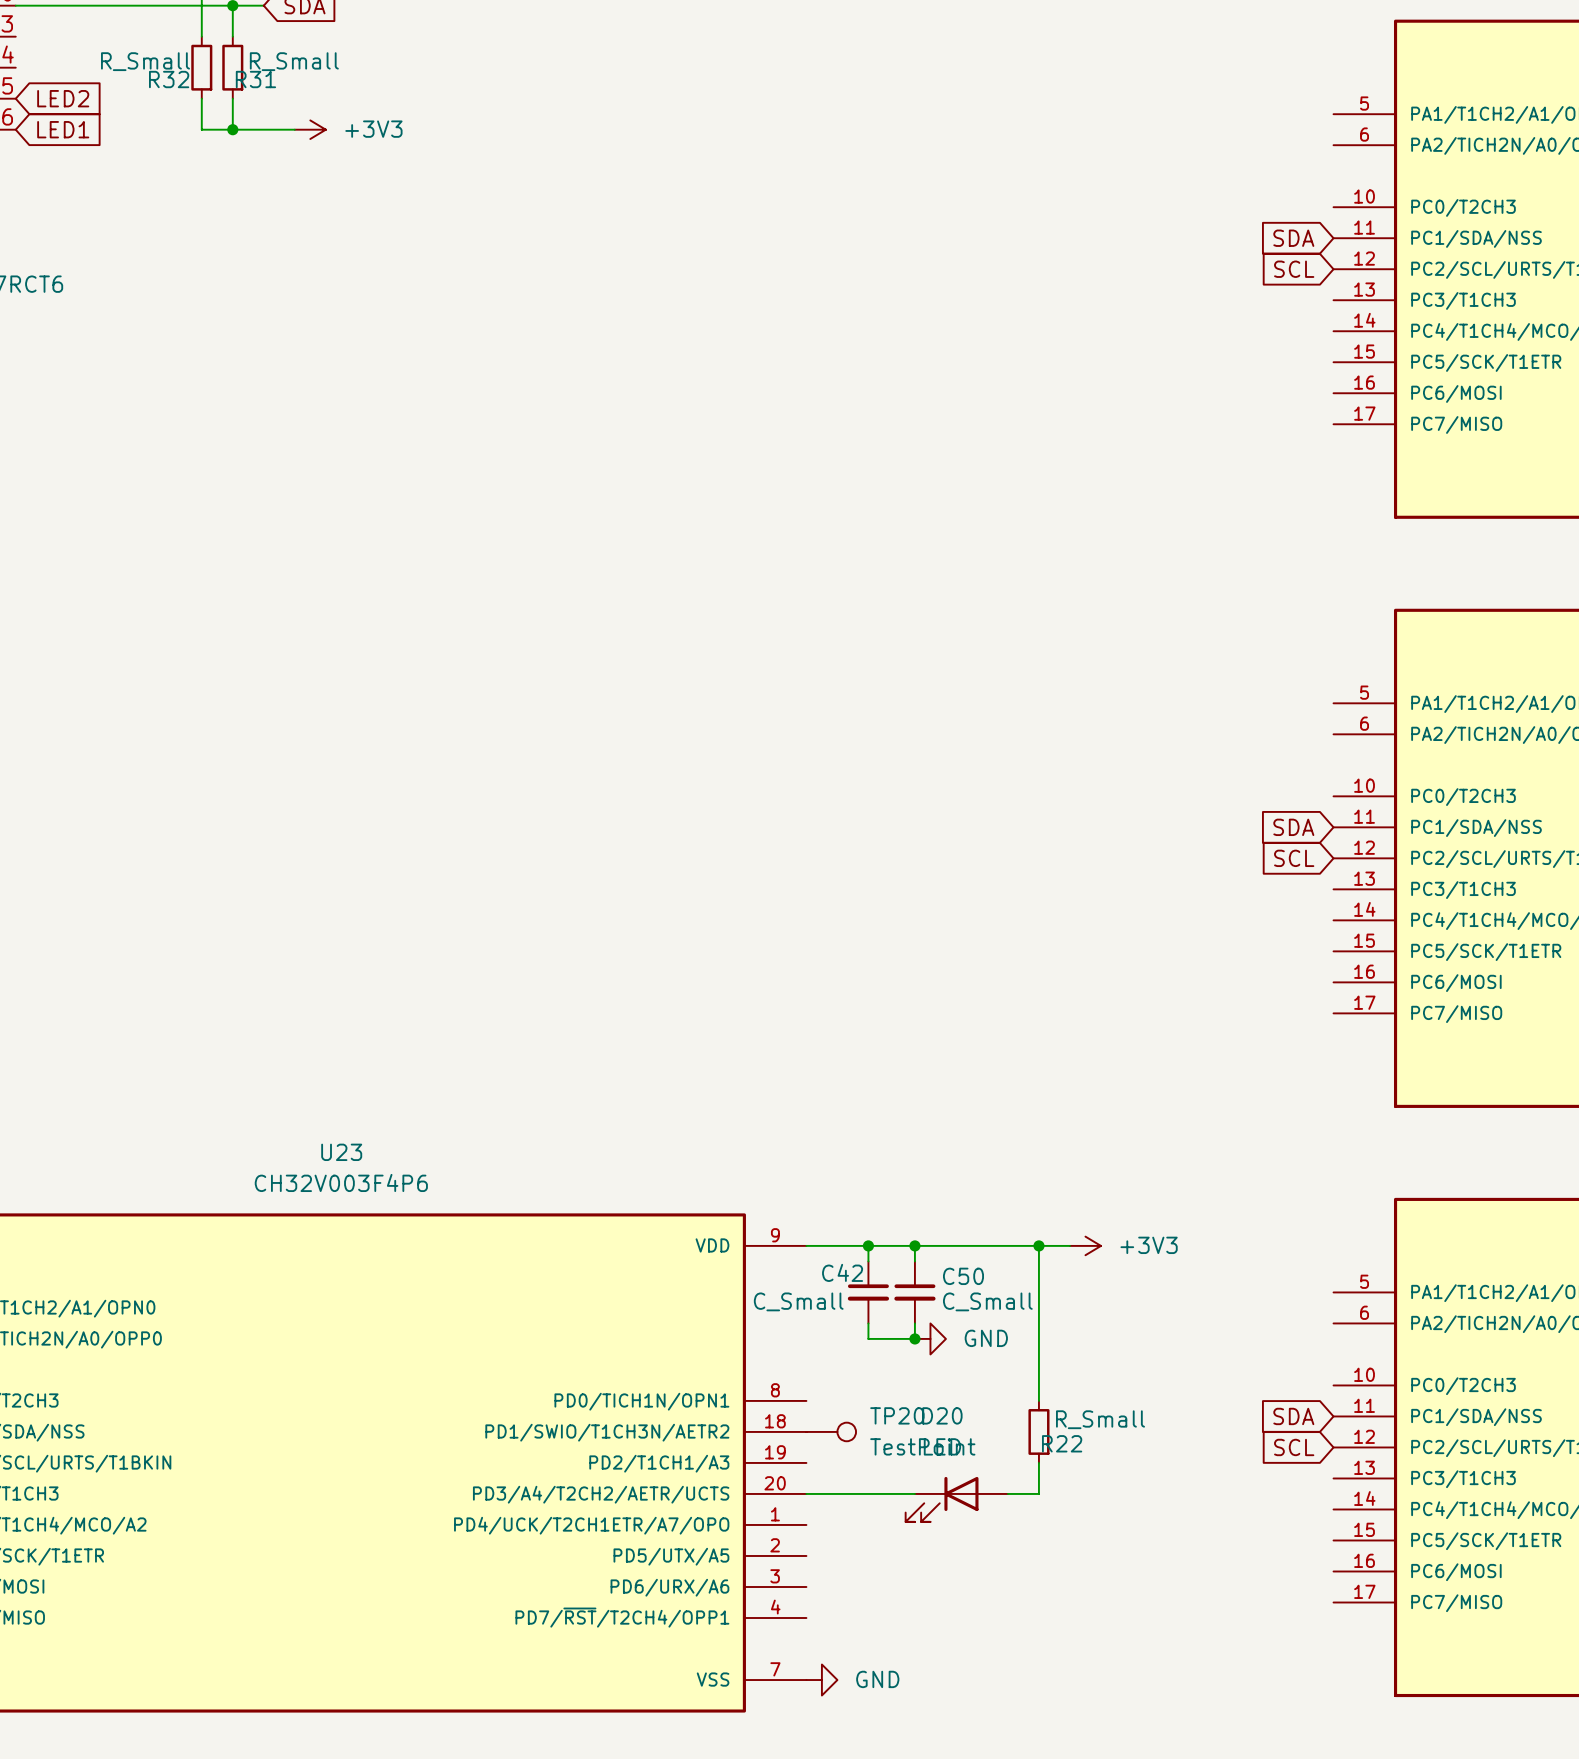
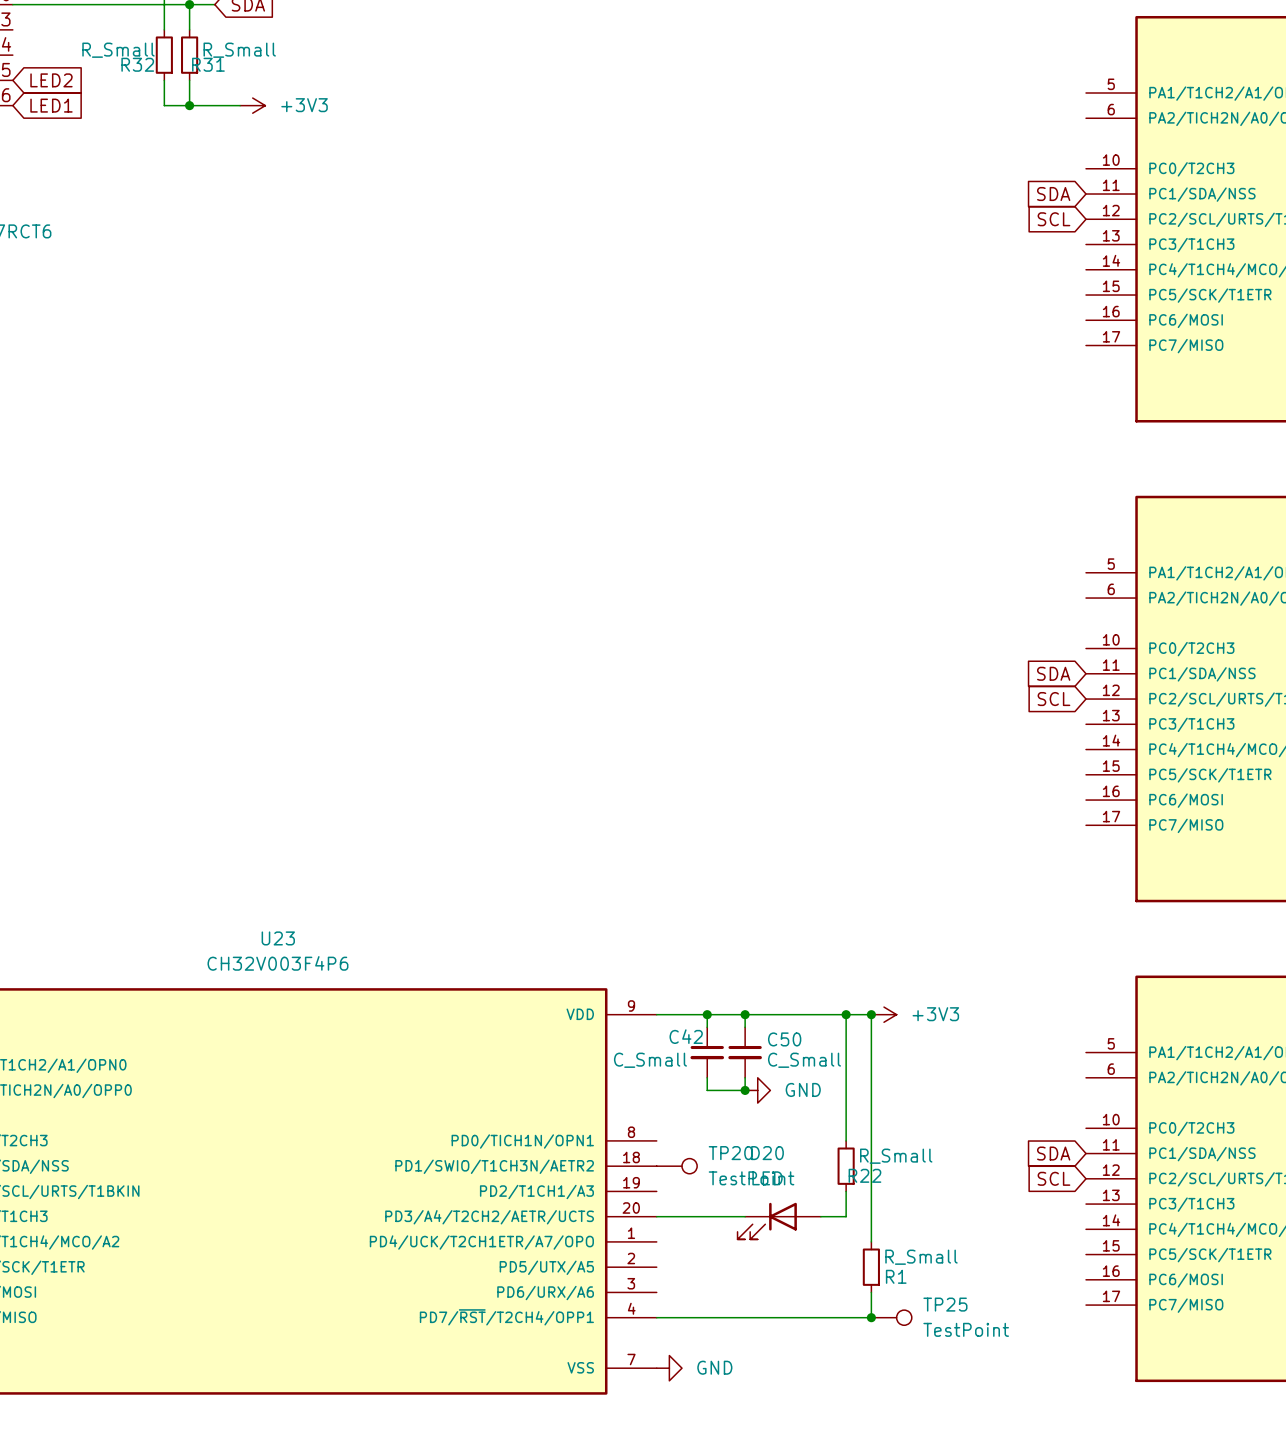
wire: none -> (871, 1014) (871, 1241)
junction: none -> (871, 1014)
R1: none -> R_Small (871, 1267)
wire: none -> (871, 1292) (871, 1317) (656, 1317)
junction: none -> (871, 1317)
TP25: none -> TestPoint (891, 1317)

